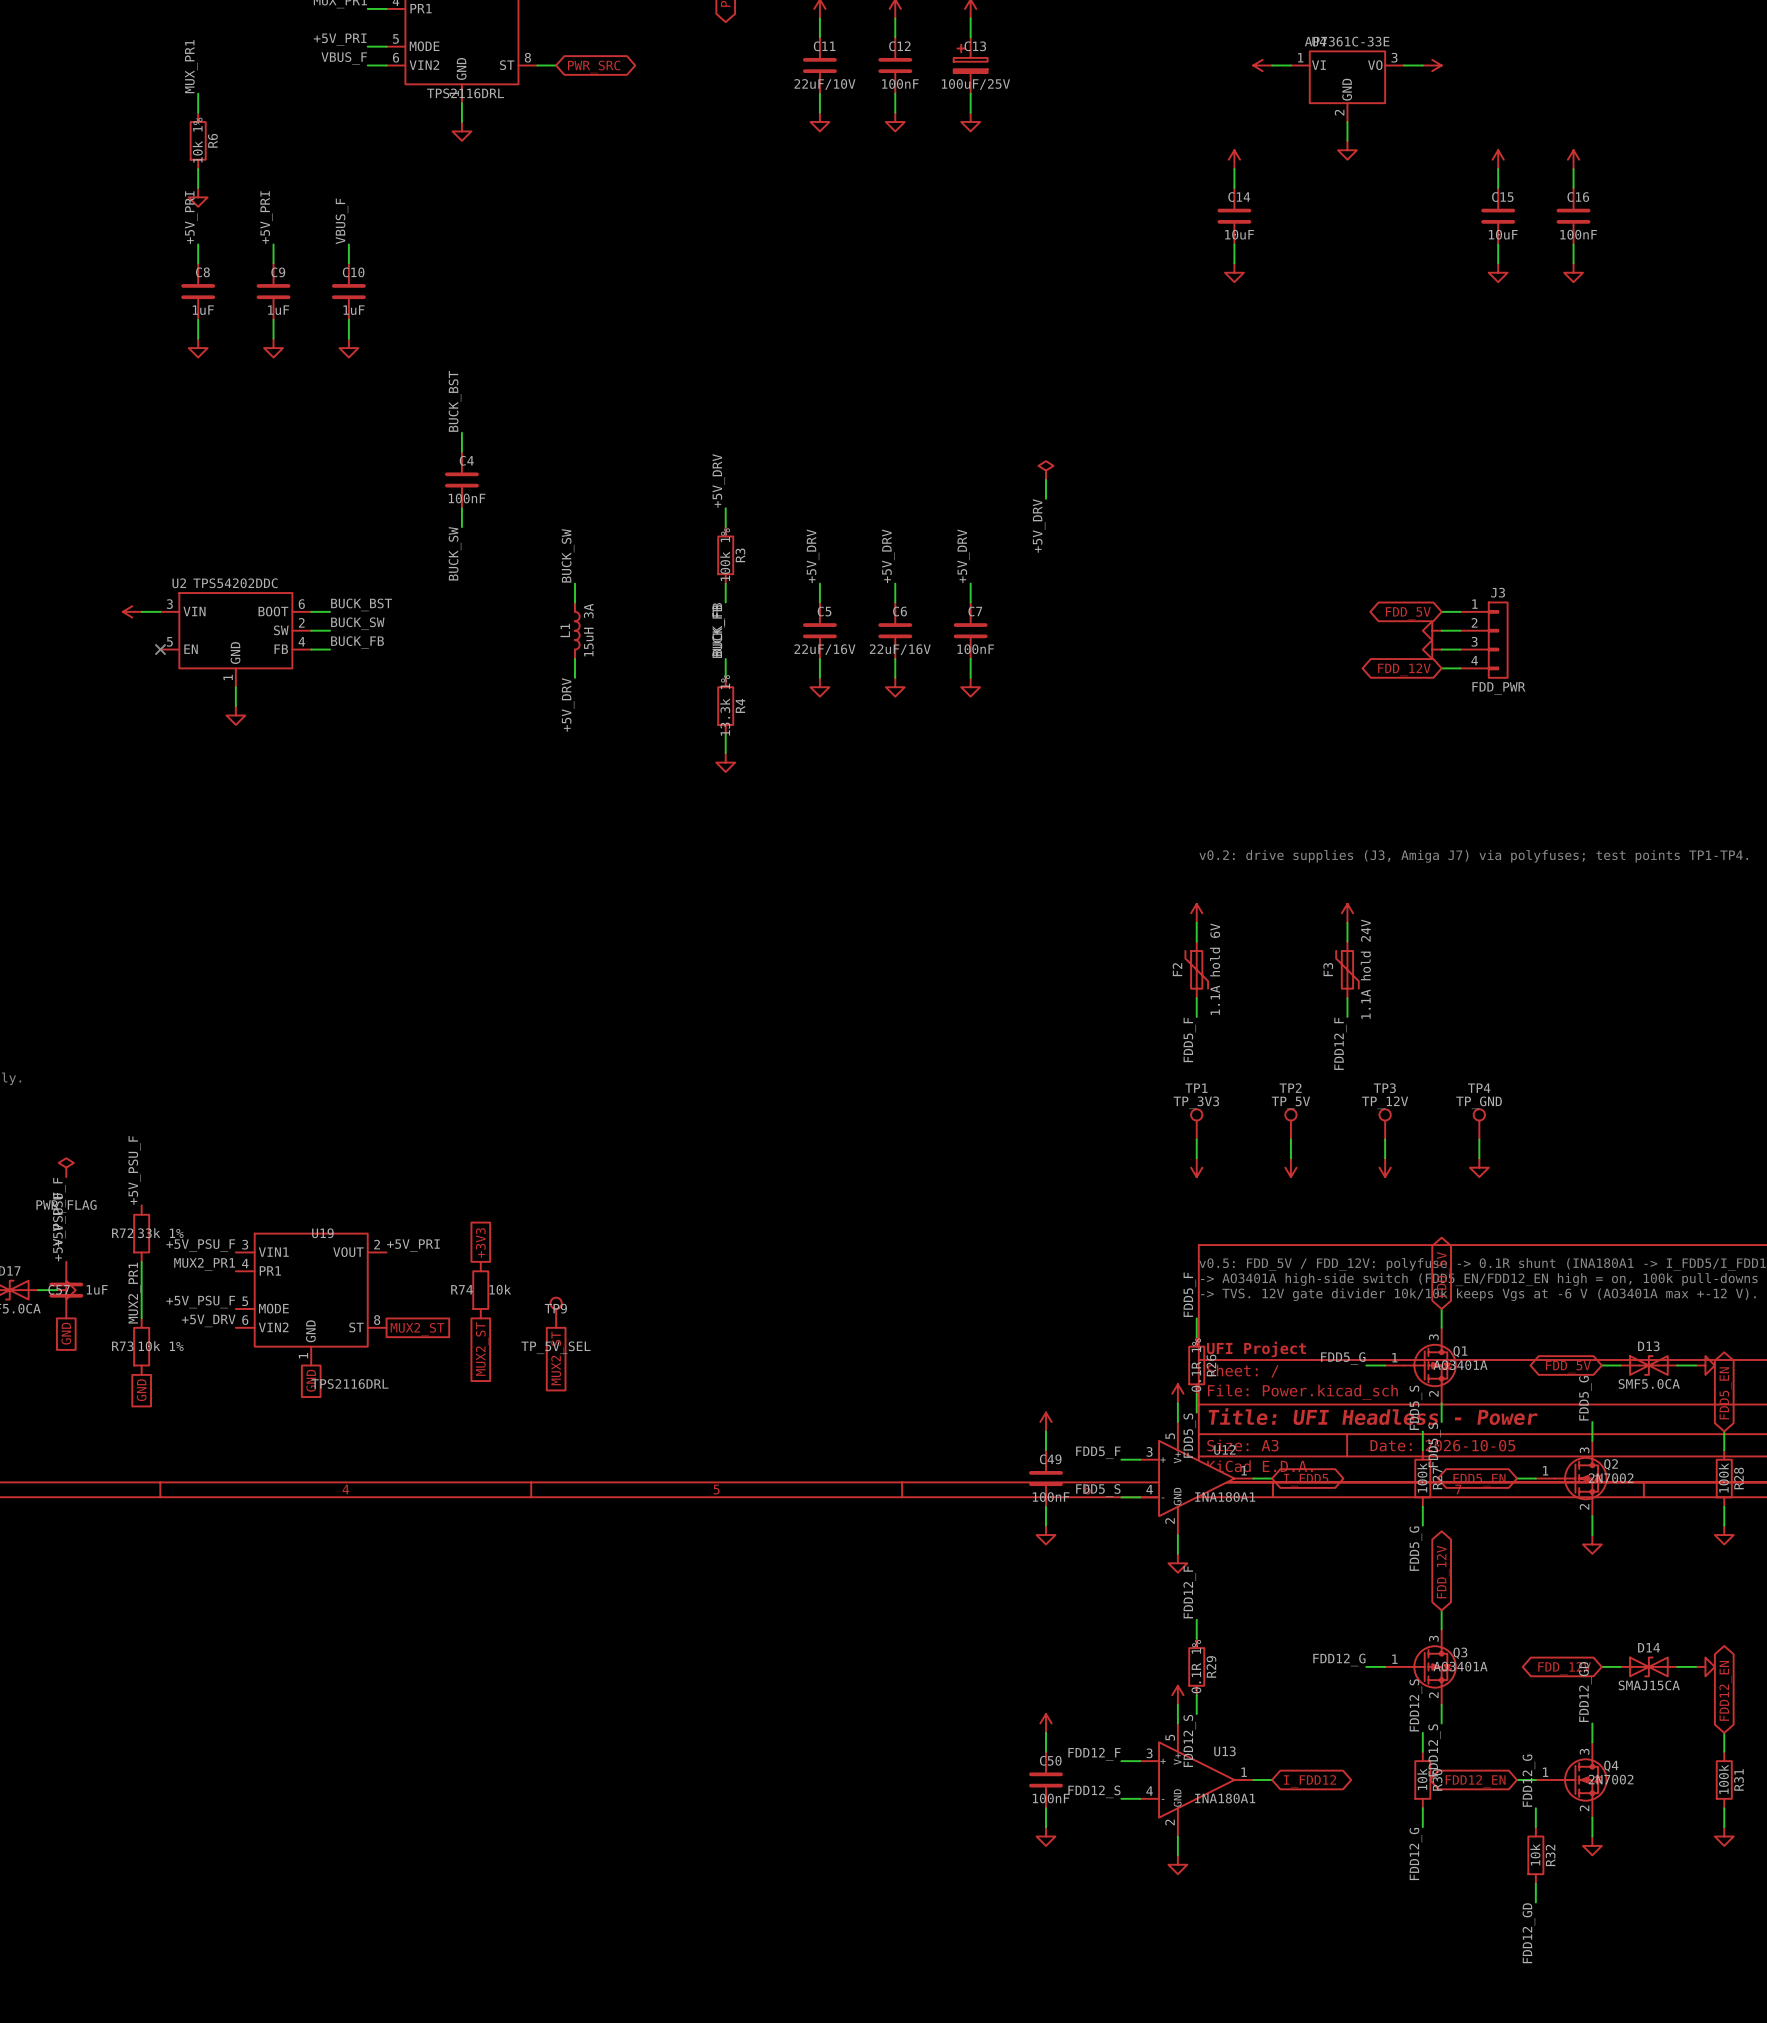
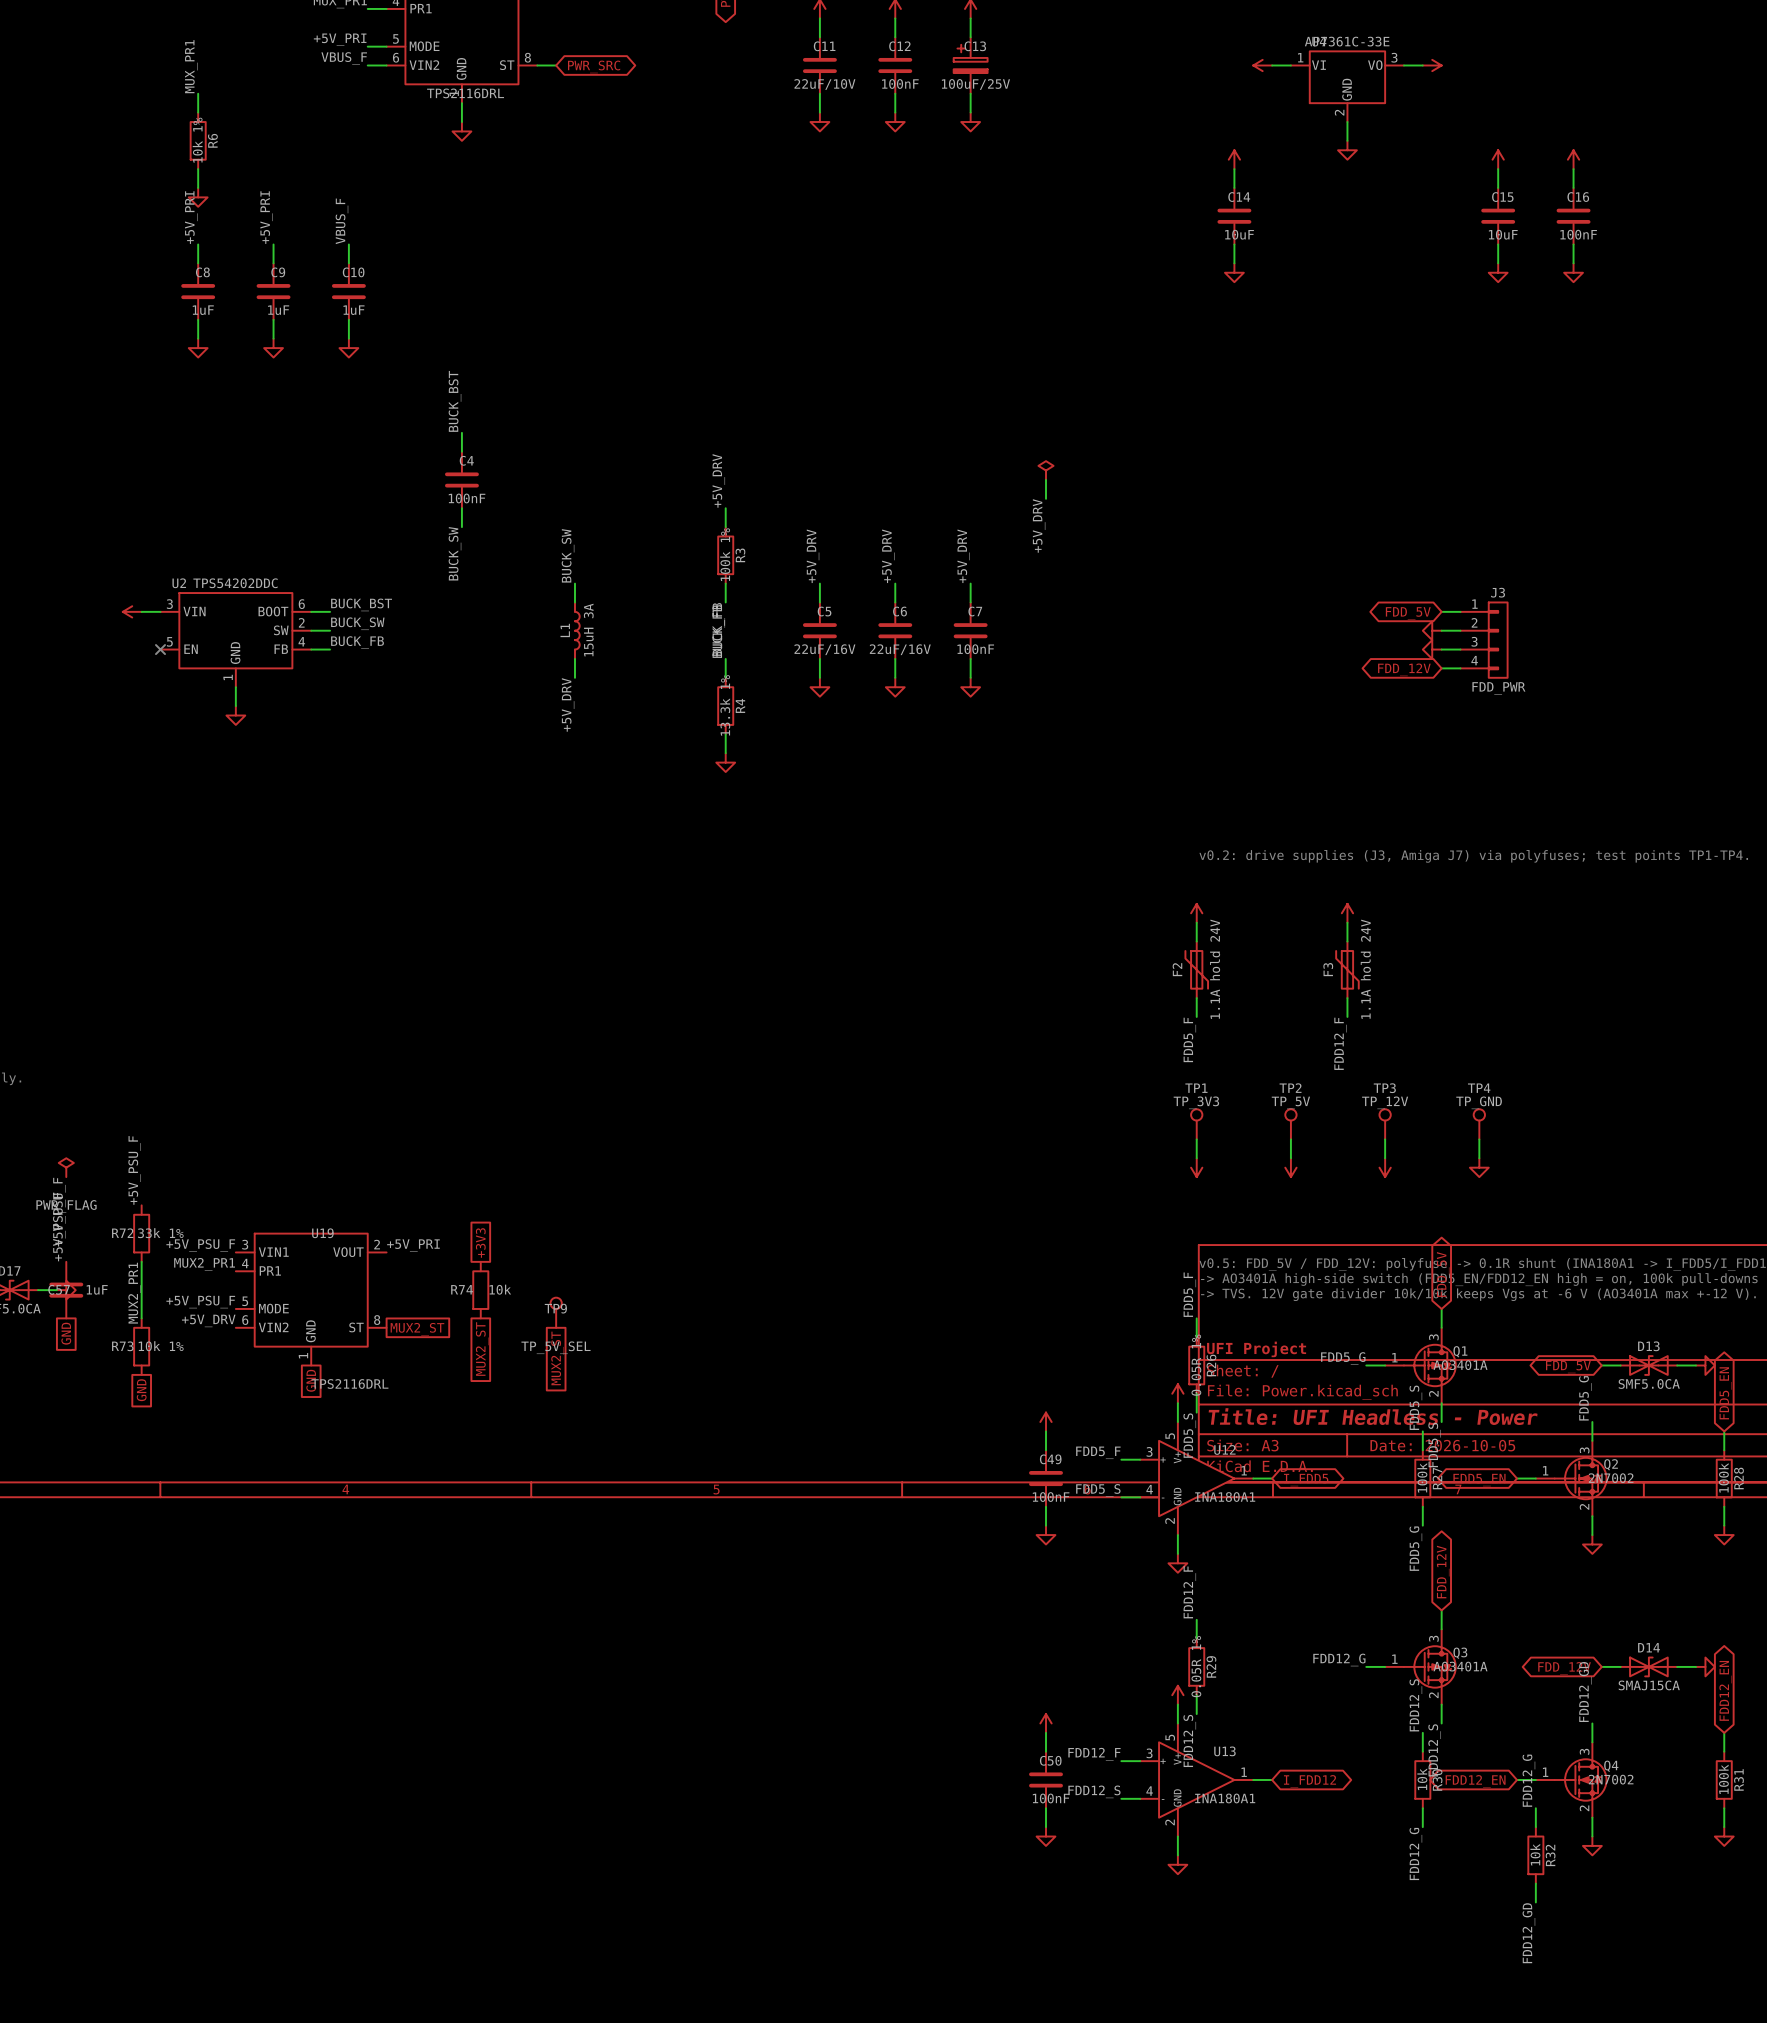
F2 value: 1.1A hold 6V (1215, 969) -> 1.1A hold 24V (1215, 969)
R26 value: 0.1R 1% (1196, 1365) -> 0.05R 1% (1196, 1365)
R29 value: 0.1R 1% (1196, 1666) -> 0.05R 1% (1196, 1666)

